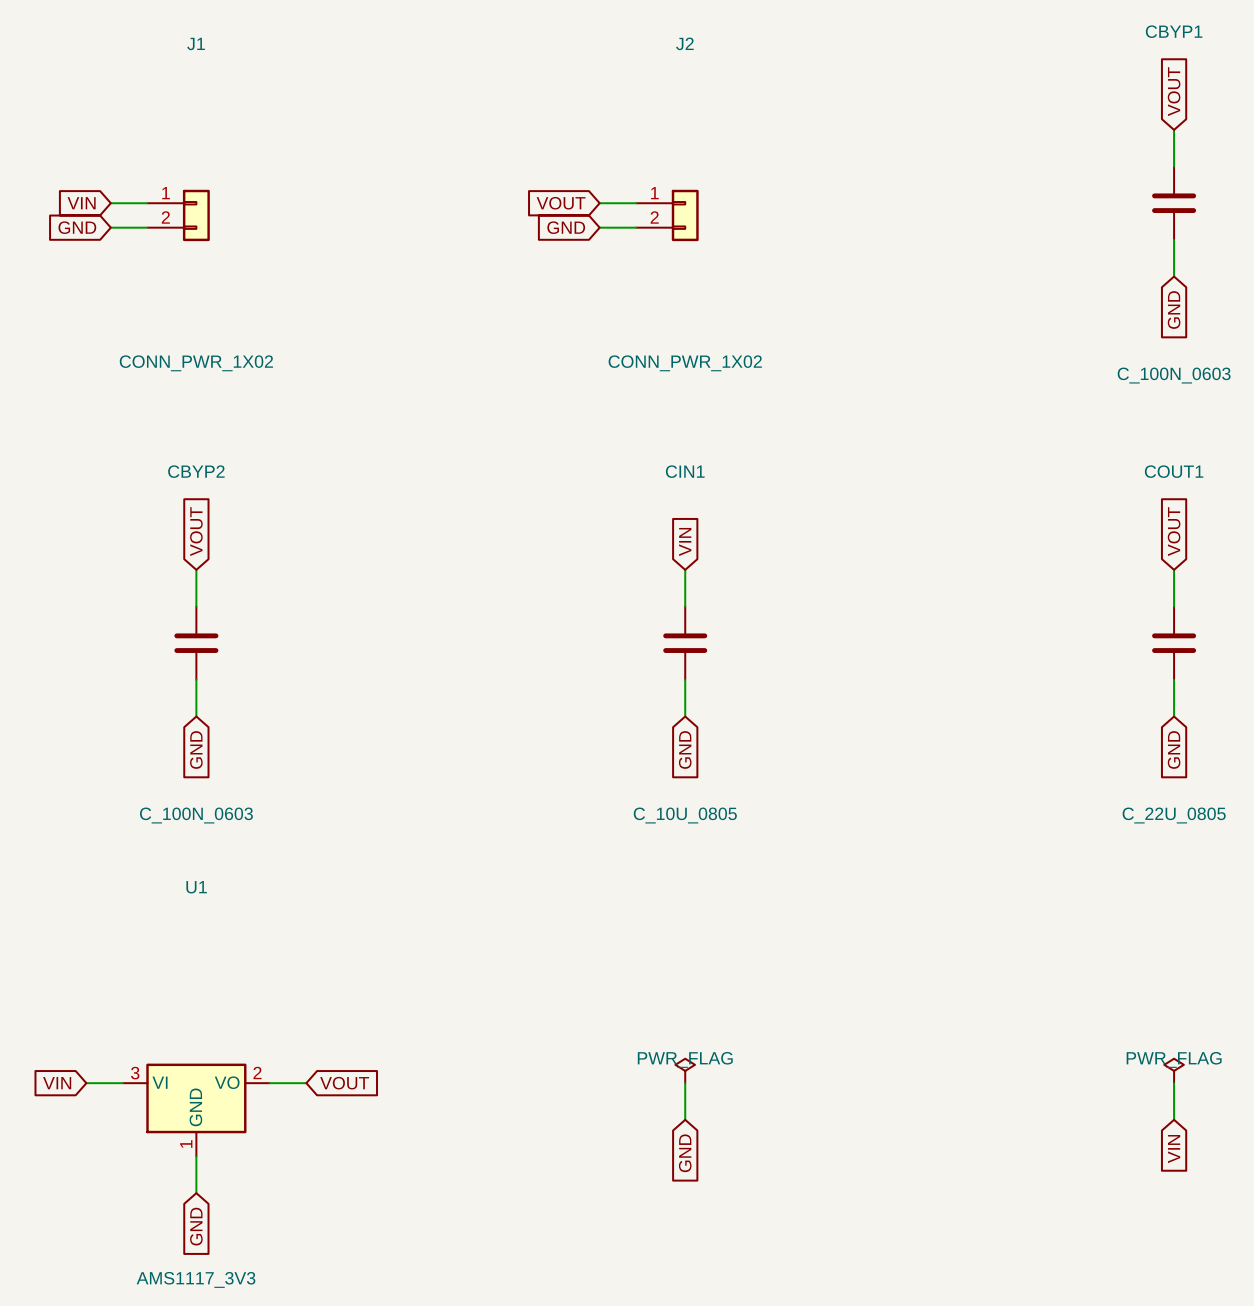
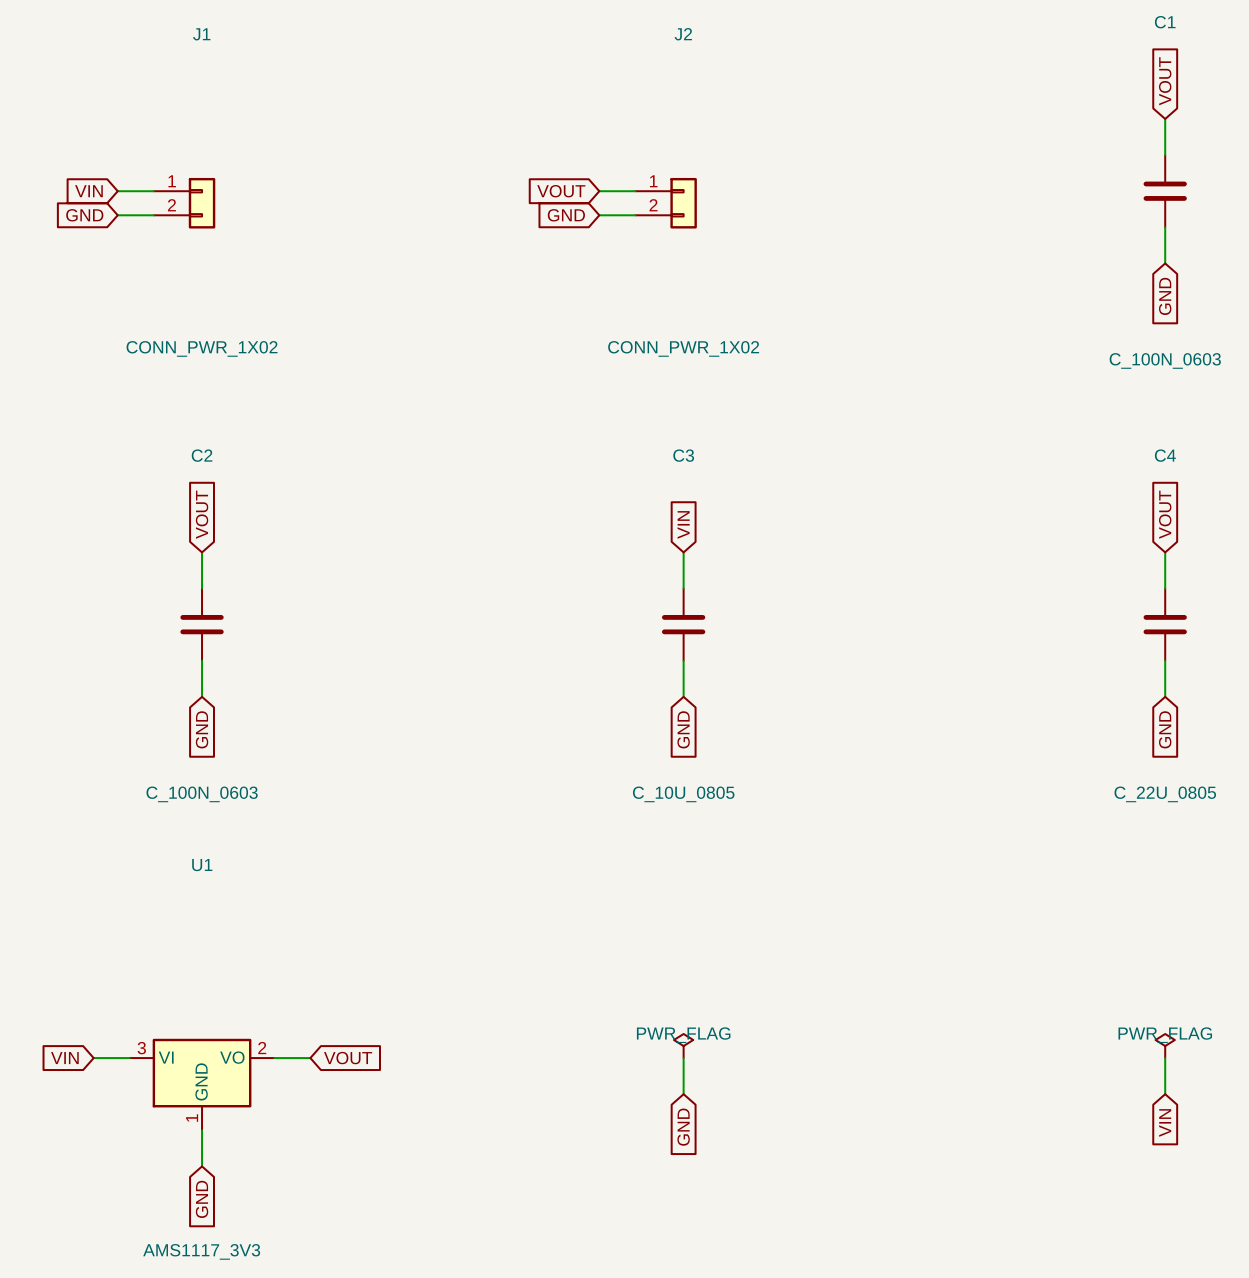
CBYP1 name: CBYP1 (1174, 31) -> C1 (1165, 22)
CBYP2 name: CBYP2 (196, 471) -> C2 (202, 455)
CIN1 name: CIN1 (685, 471) -> C3 (683, 455)
COUT1 name: COUT1 (1174, 471) -> C4 (1165, 455)

